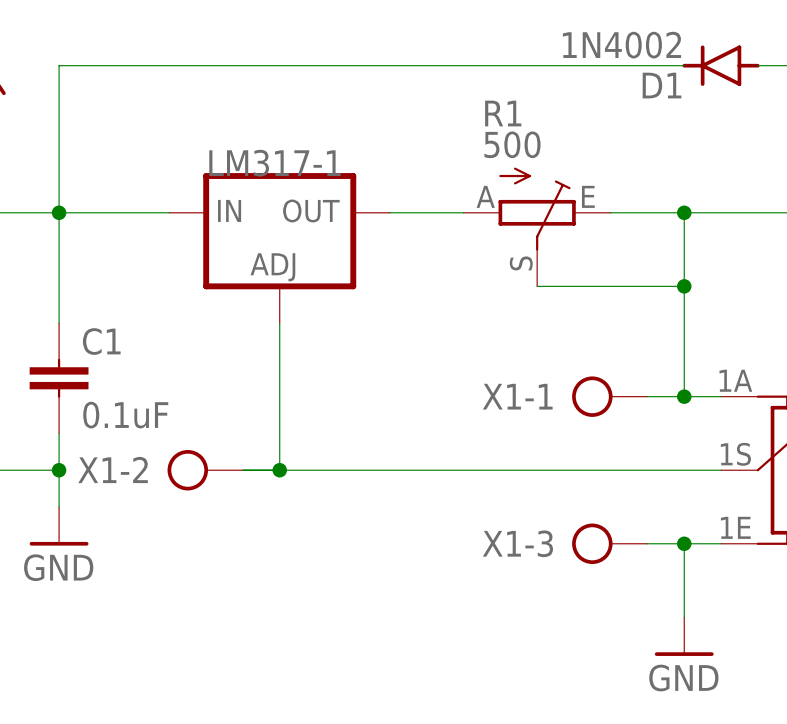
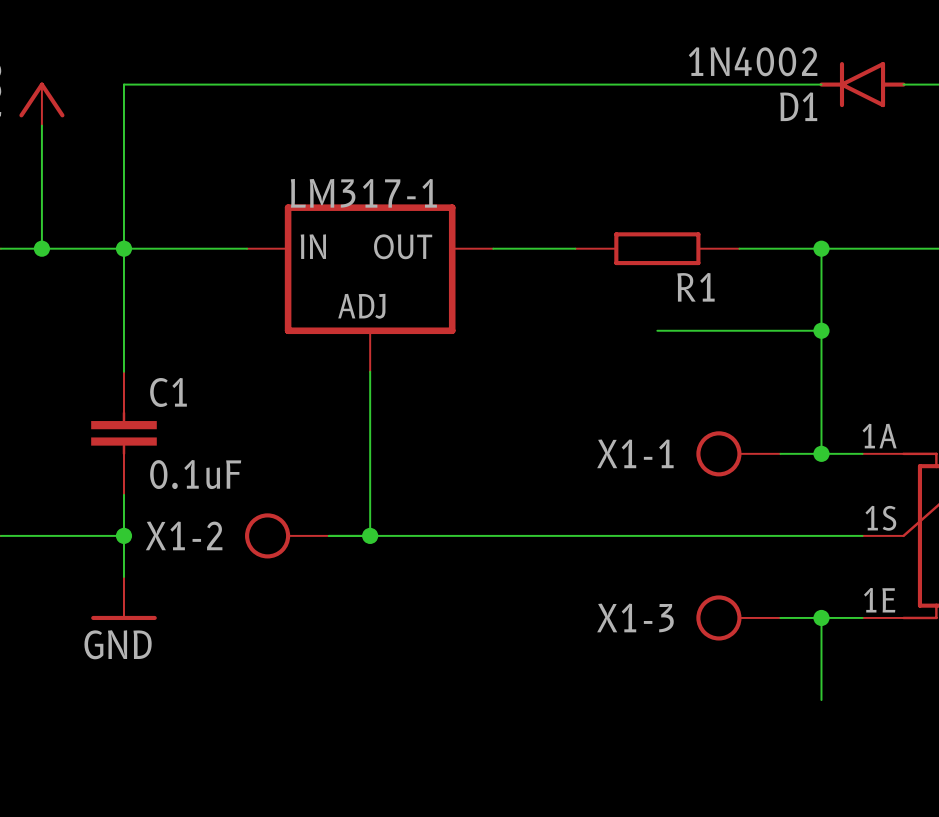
R1 name position: R1 (503, 113) -> R1 (696, 287)
R1 value: 500 (512, 144) -> none
R1 symbol: [463, 167, 611, 287] -> [575, 232, 740, 266]
power symbol: GND (684, 636) -> none

